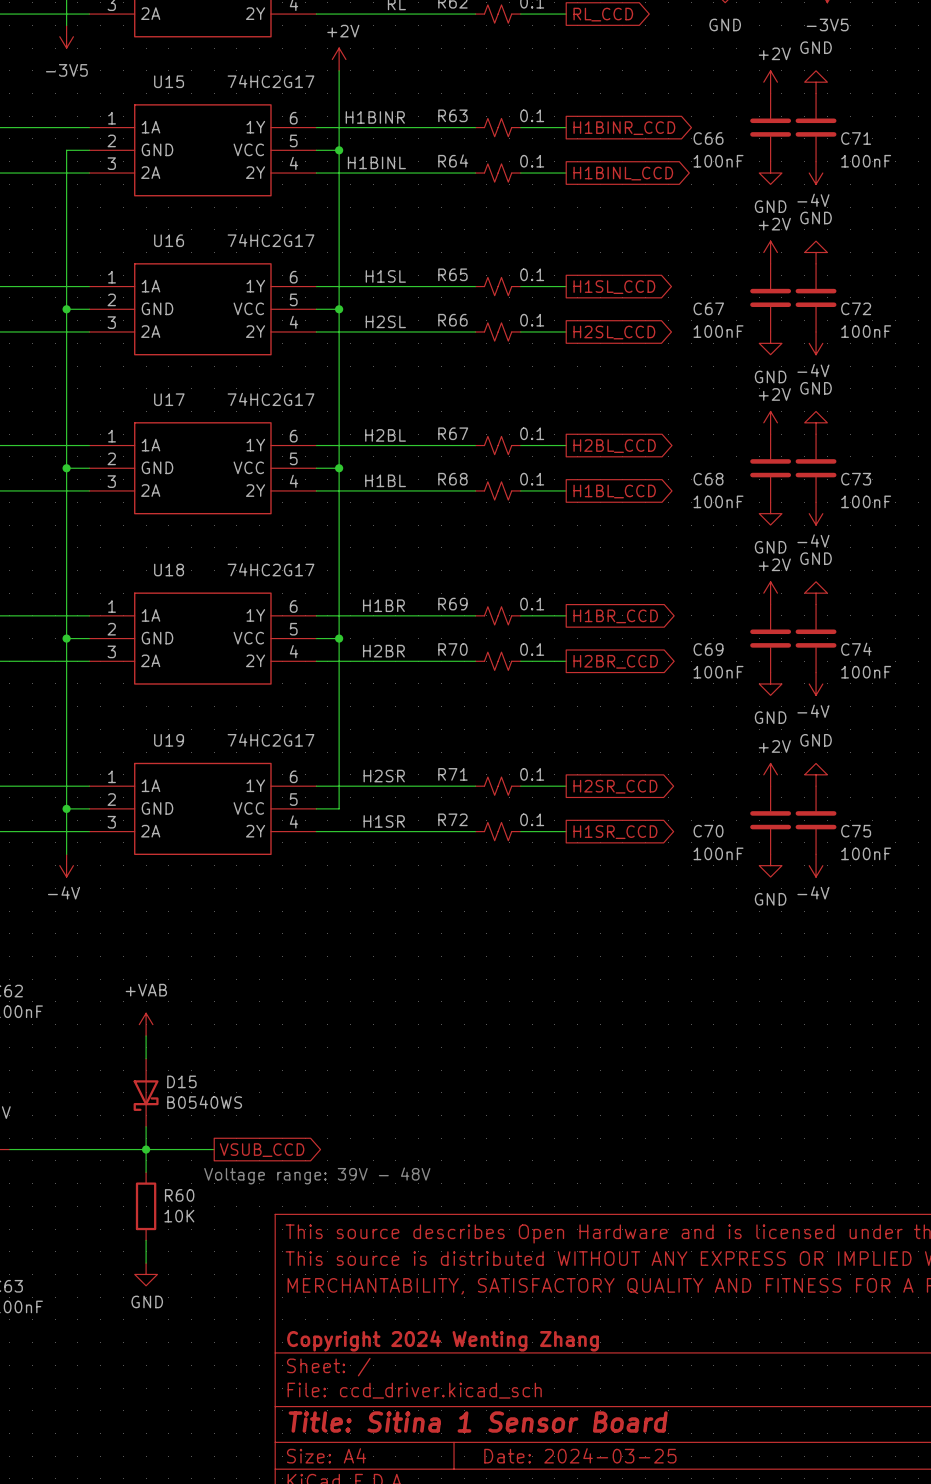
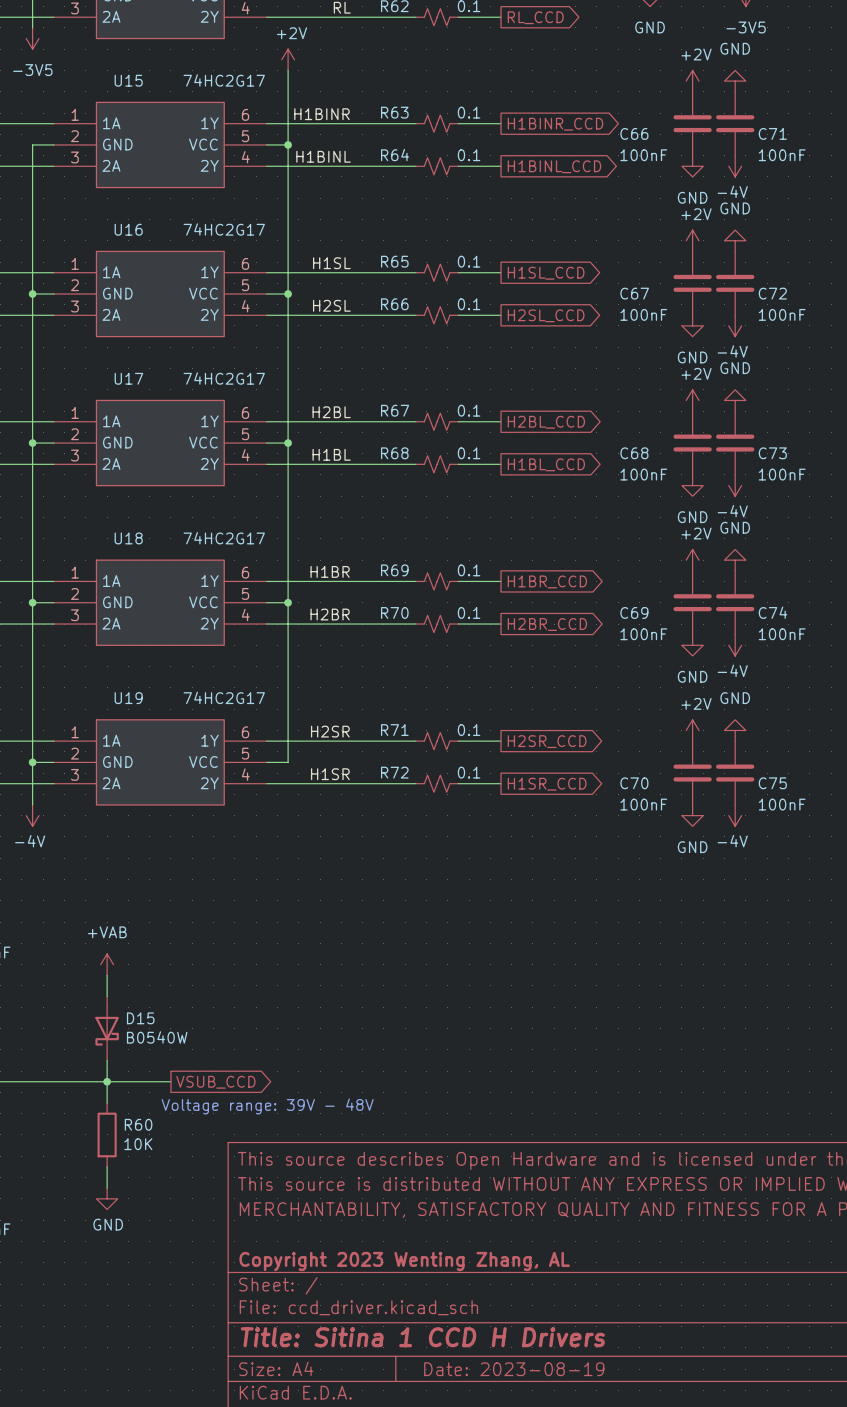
D15 value: B0540WS (204, 1102) -> B0540W (157, 1037)
title block: Copyright 2024 Wenting Zhang (443, 1340) -> Copyright 2023 Wenting Zhang, AL (404, 1261)
title block: Title: Sitina 1 Sensor Board (478, 1422) -> Title: Sitina 1 CCD H Drivers (422, 1337)
title block: Date: 2024-03-25 (580, 1455) -> Date: 2023-08-19 (514, 1369)

